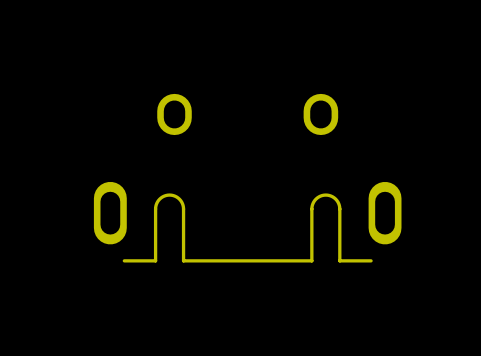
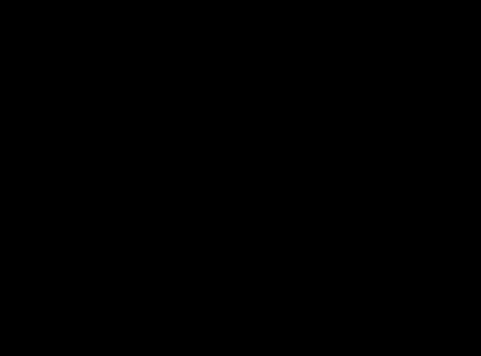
part: (247, 178) -> none

